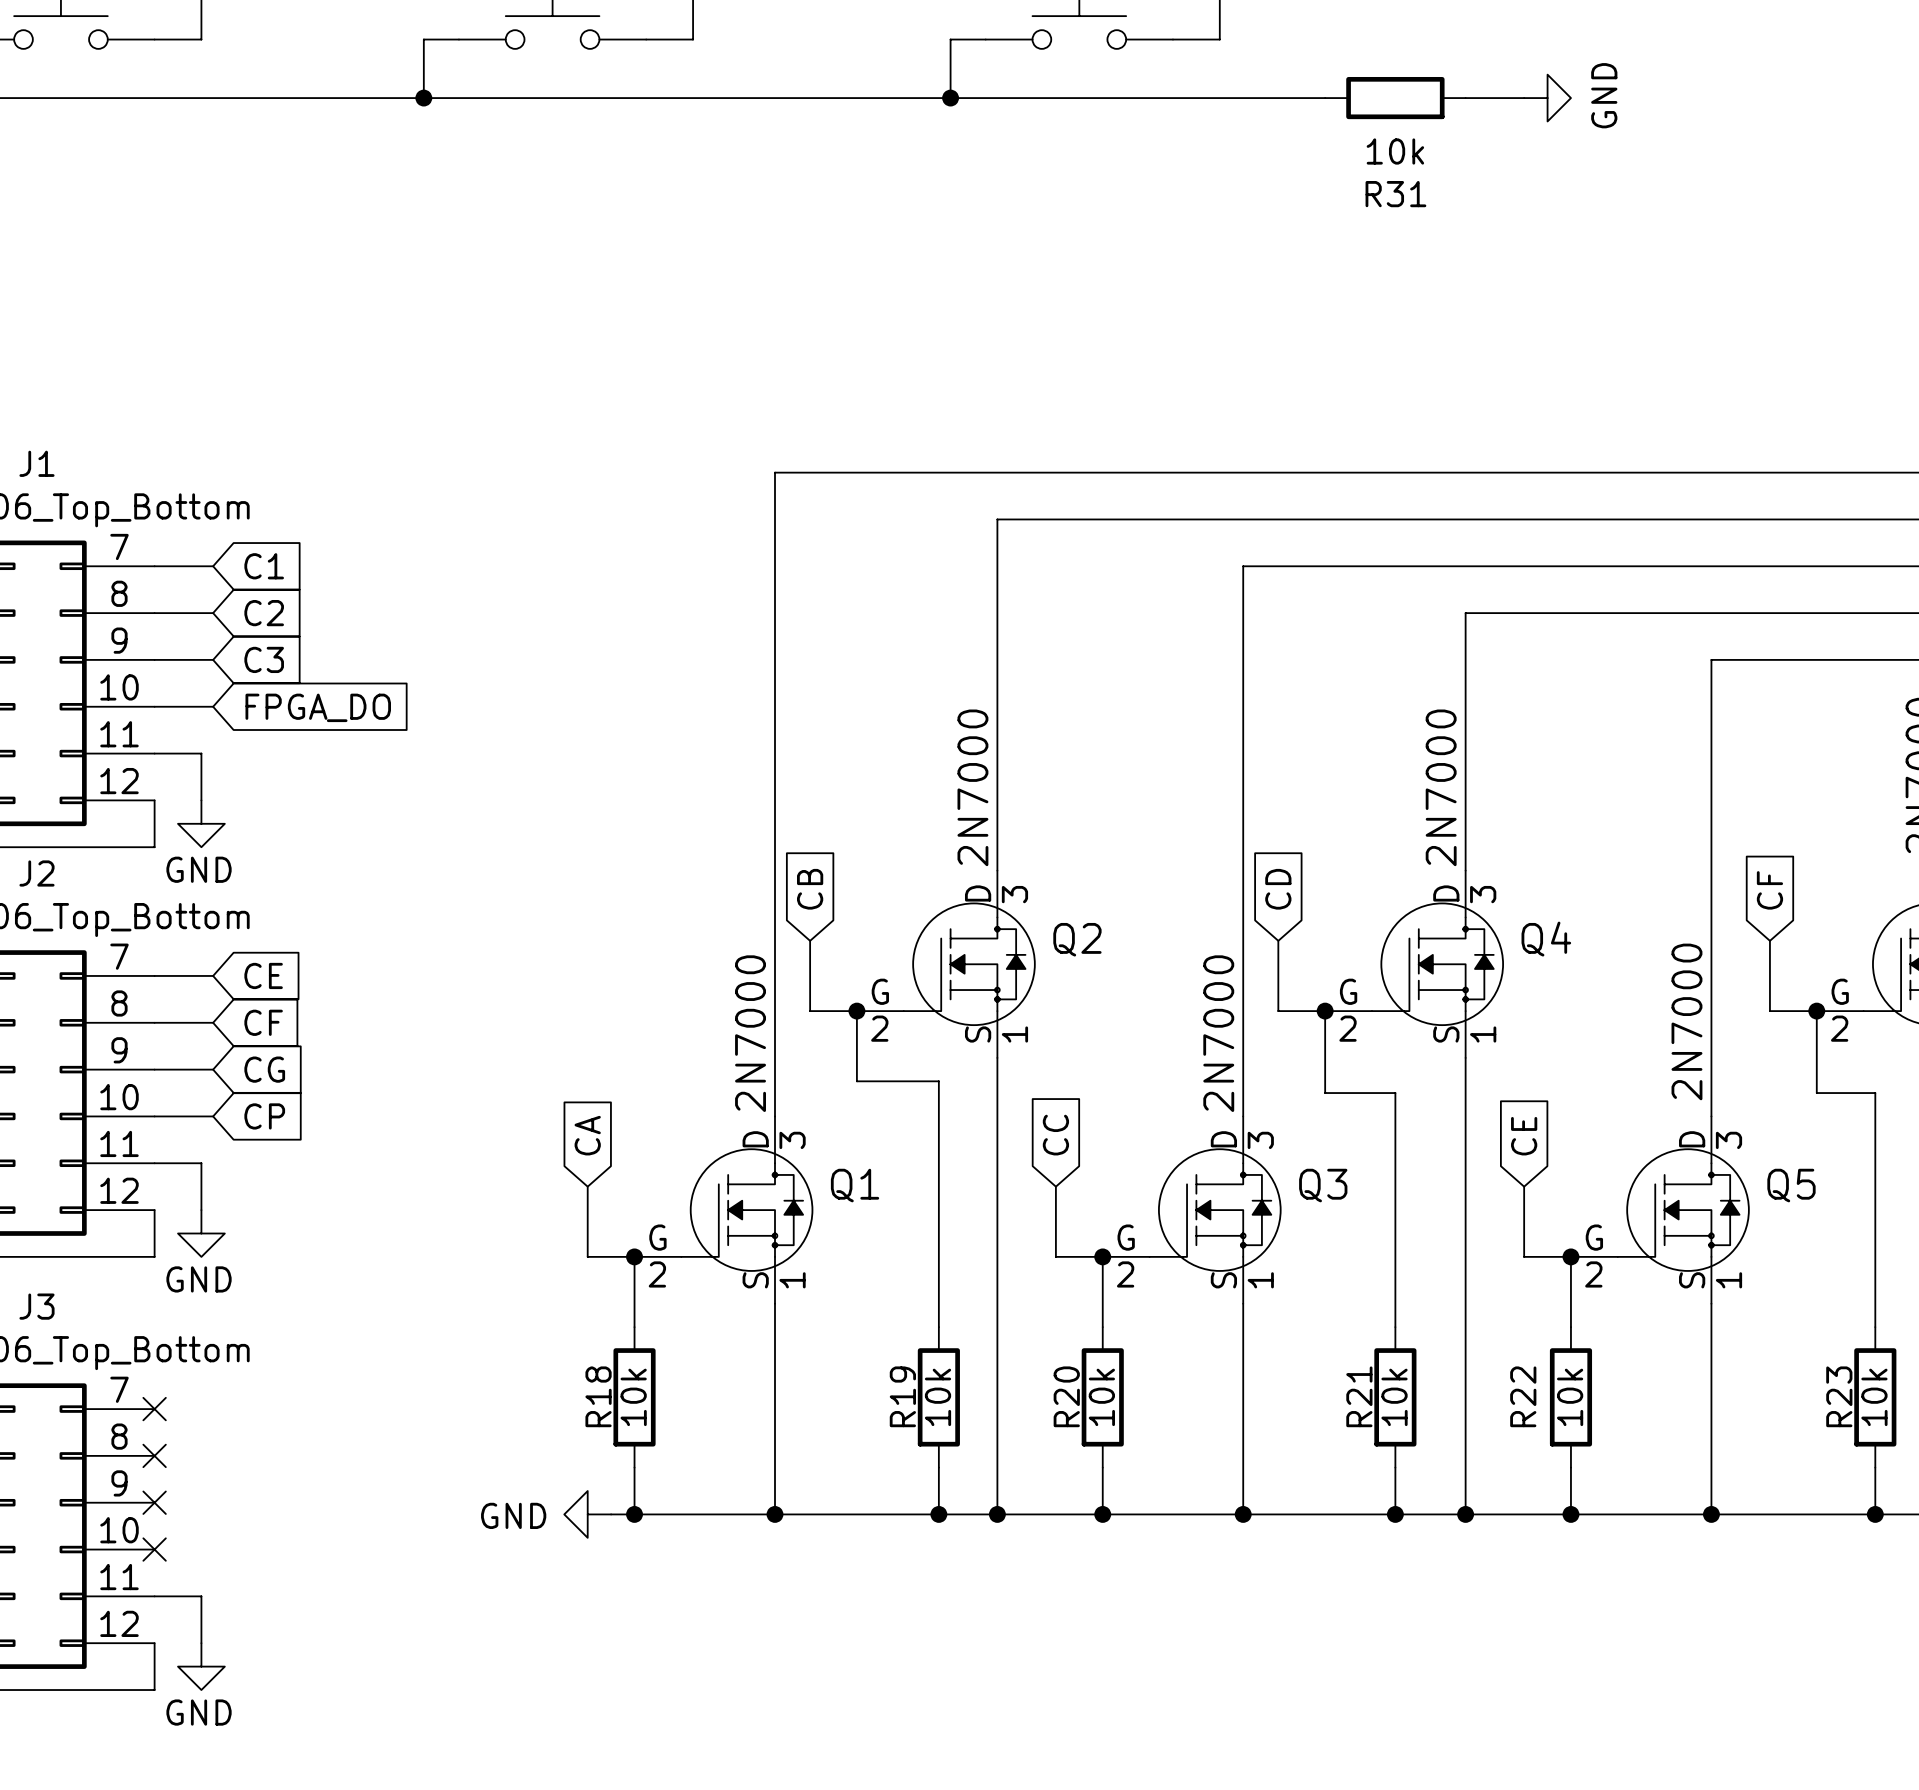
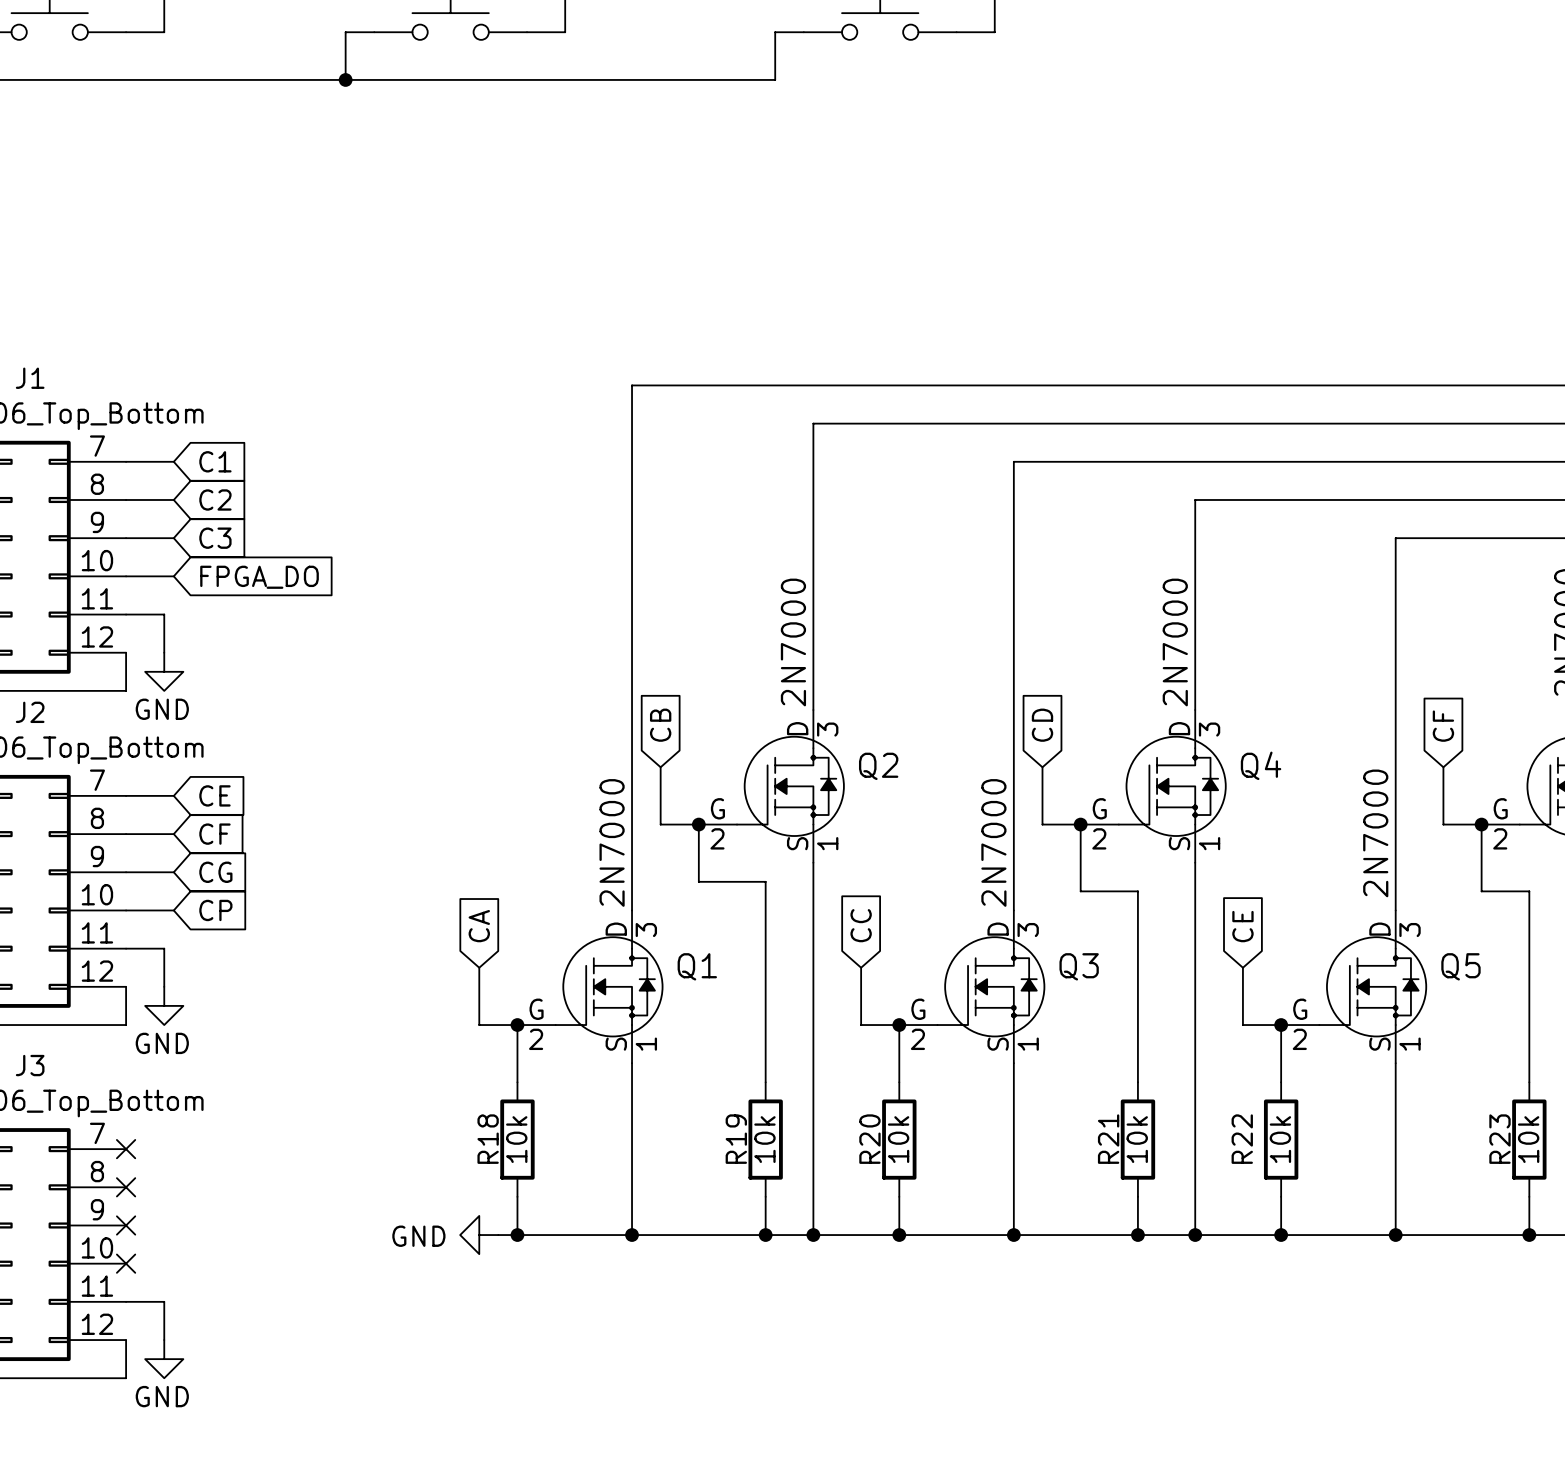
wire: (950, 98) (1325, 98) -> none
junction: (950, 98) -> none
R31: 10k (1395, 98) -> none
wire: (1465, 98) (1524, 98) -> none
power symbol: GND (1547, 98) -> none

